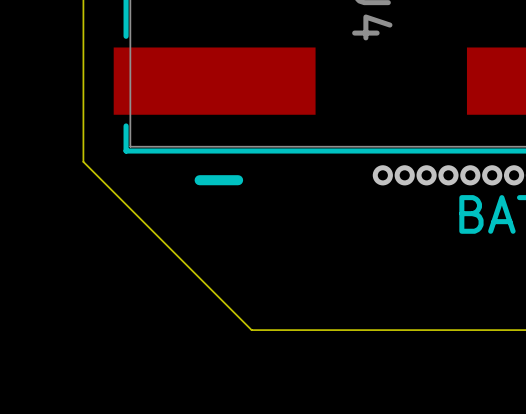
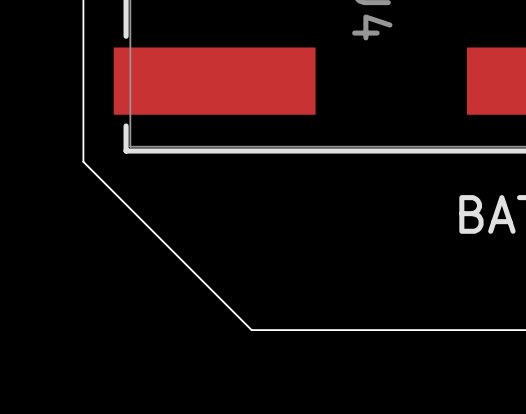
via: (382, 175) -> none
via: (404, 175) -> none
via: (426, 175) -> none
via: (448, 175) -> none
via: (470, 175) -> none
via: (492, 175) -> none
via: (514, 175) -> none
text: - (218, 180) -> none

